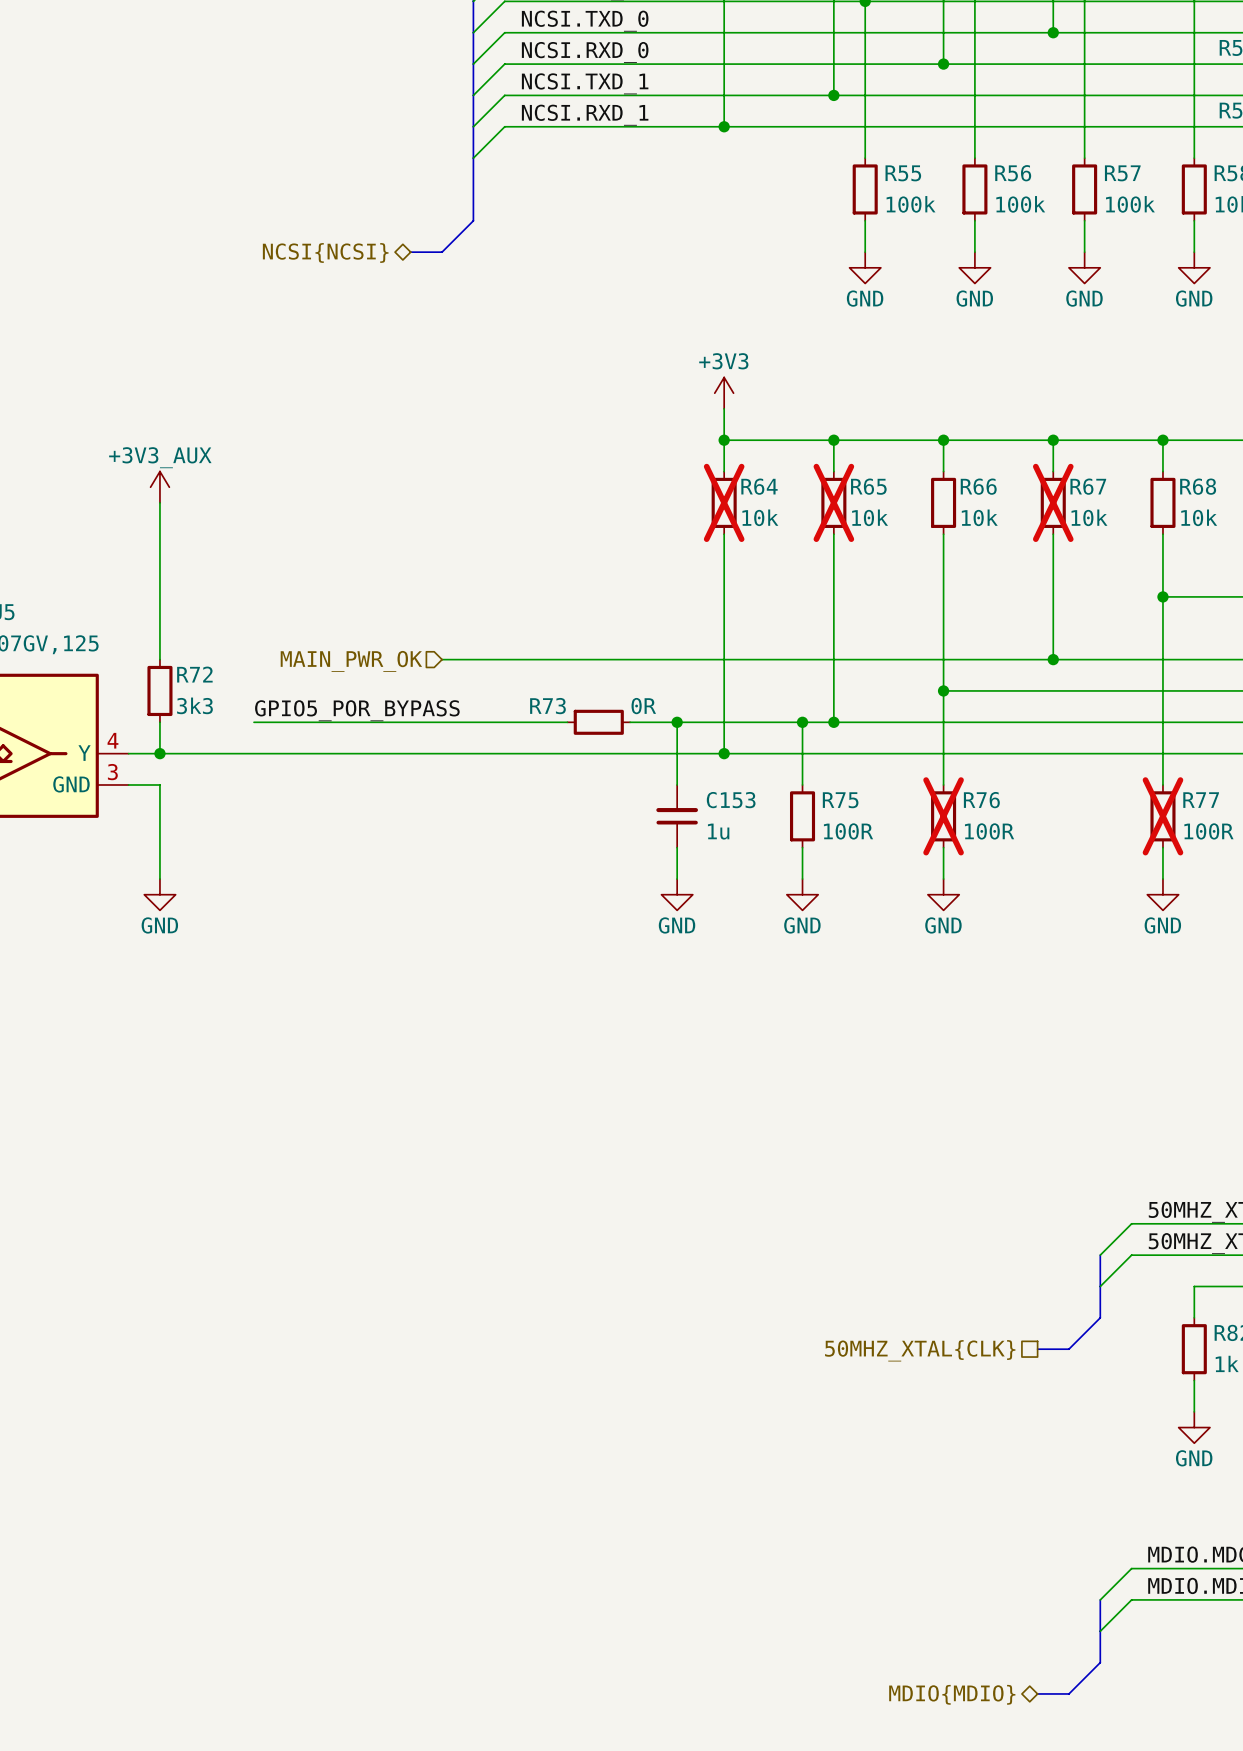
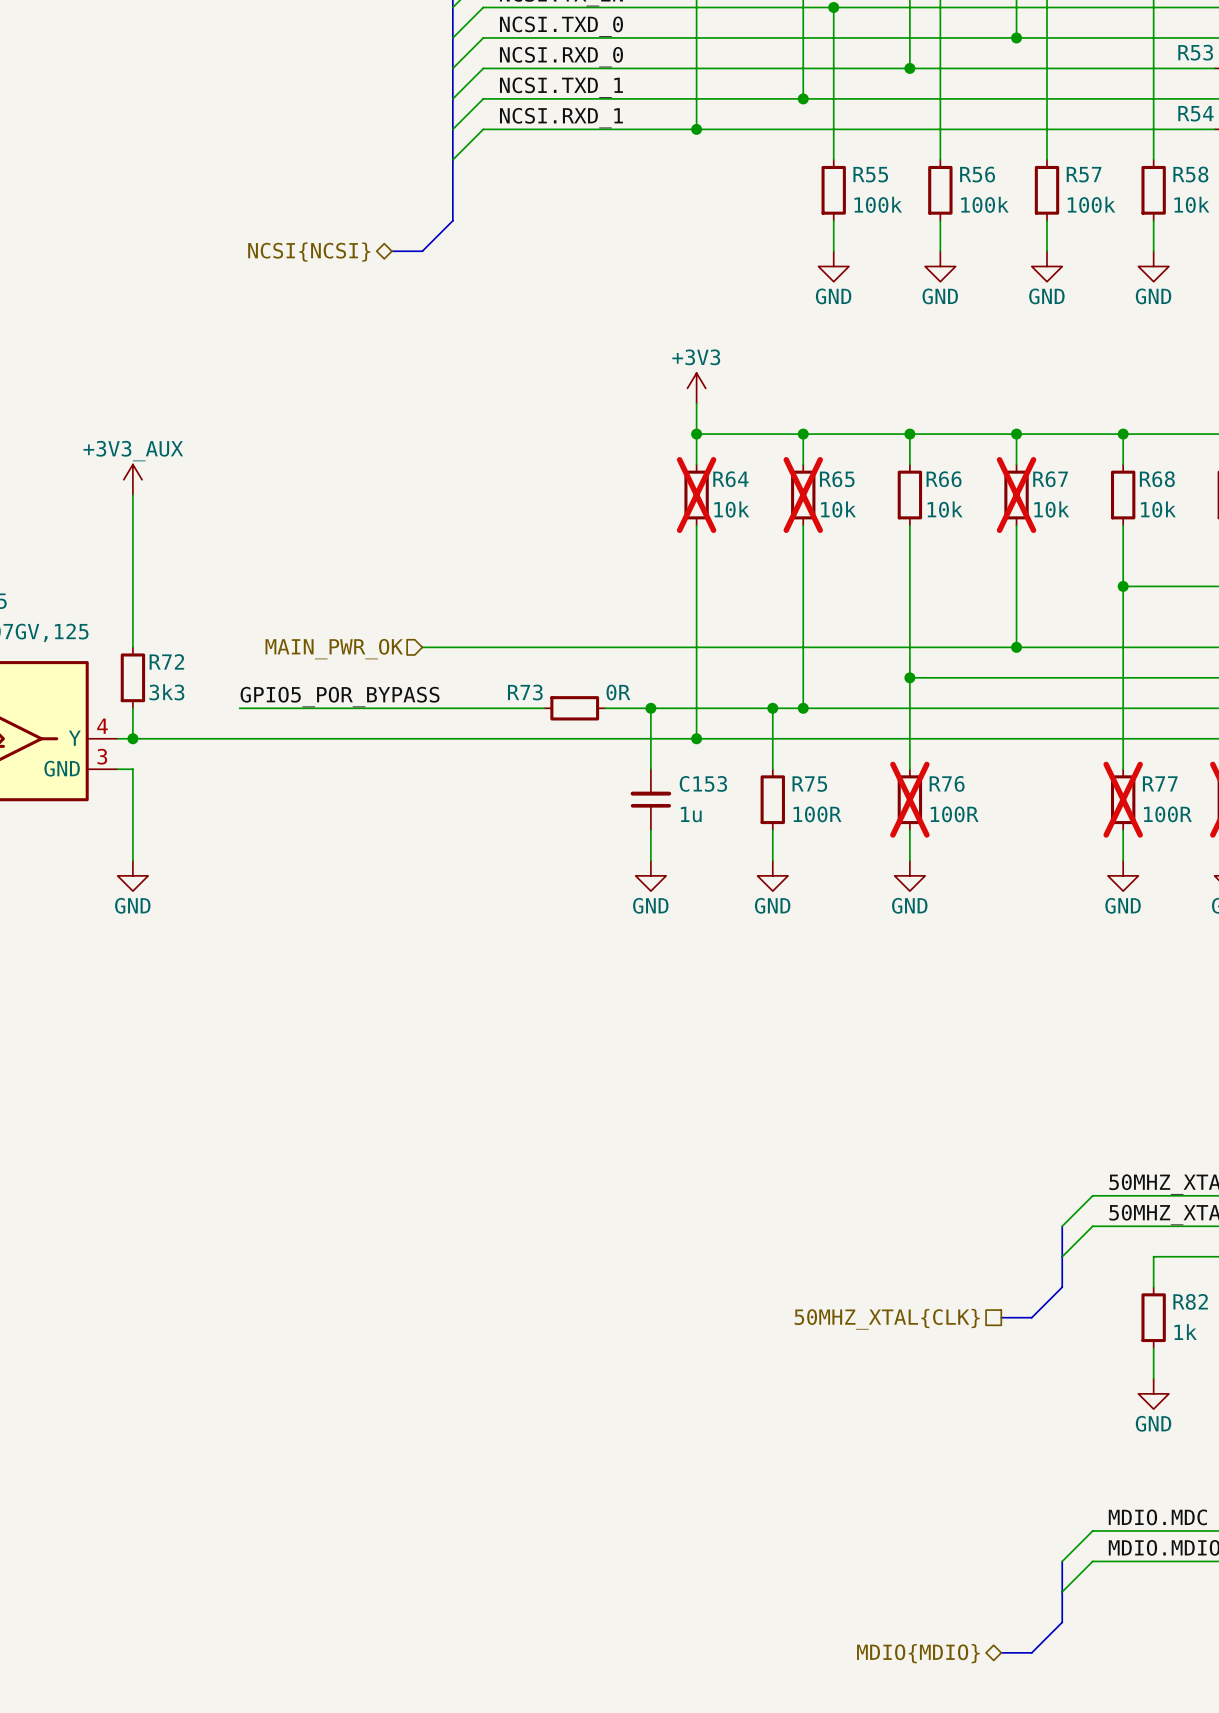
power symbol position: +3V3_AUX (159, 487) -> +3V3_AUX (132, 479)
wire: (159, 502) (159, 659) -> (132, 495) (132, 647)
R72 position: (159, 690) -> (132, 677)
wire: (159, 722) (159, 753) -> (132, 708) (132, 738)
junction position: (159, 753) -> (132, 738)
wire: (144, 784) (159, 784) (159, 879) -> (132, 769) (132, 860)
power symbol position: GND (159, 894) -> GND (132, 875)

